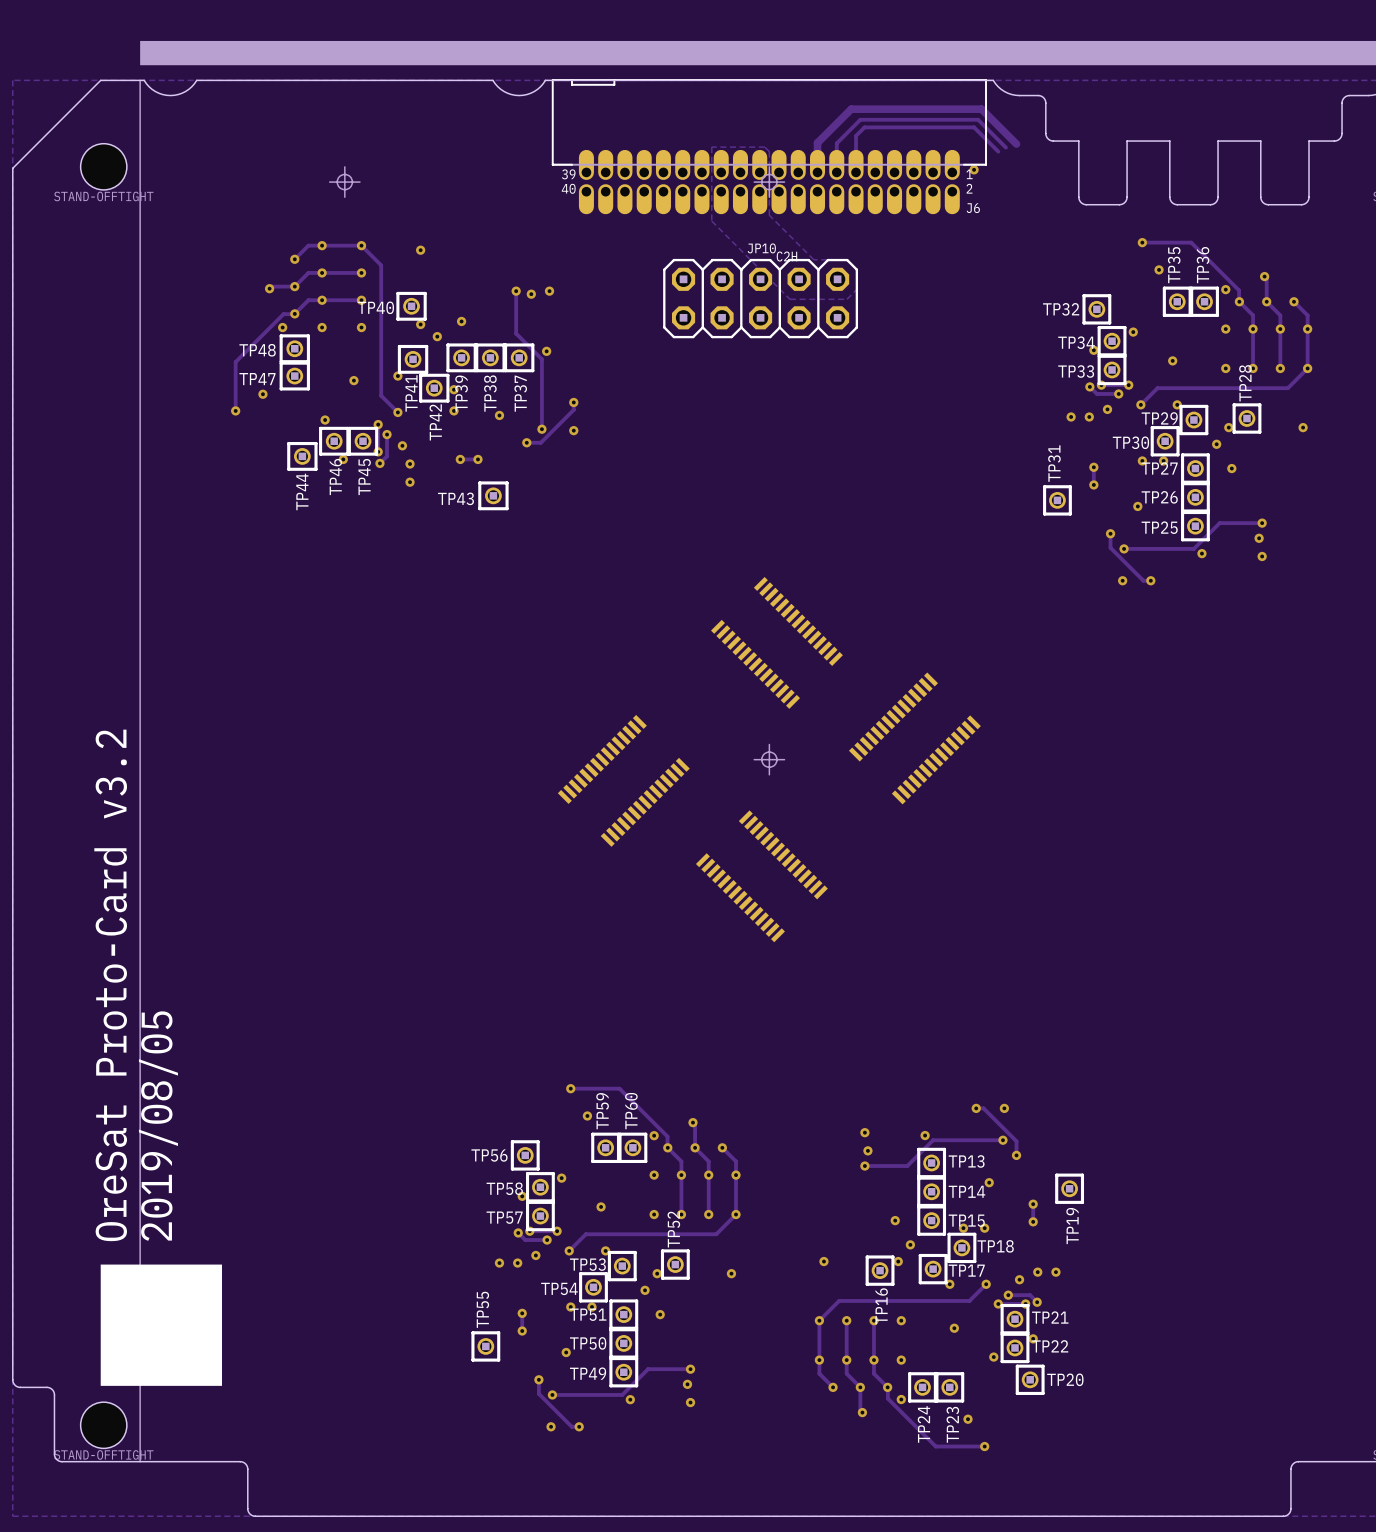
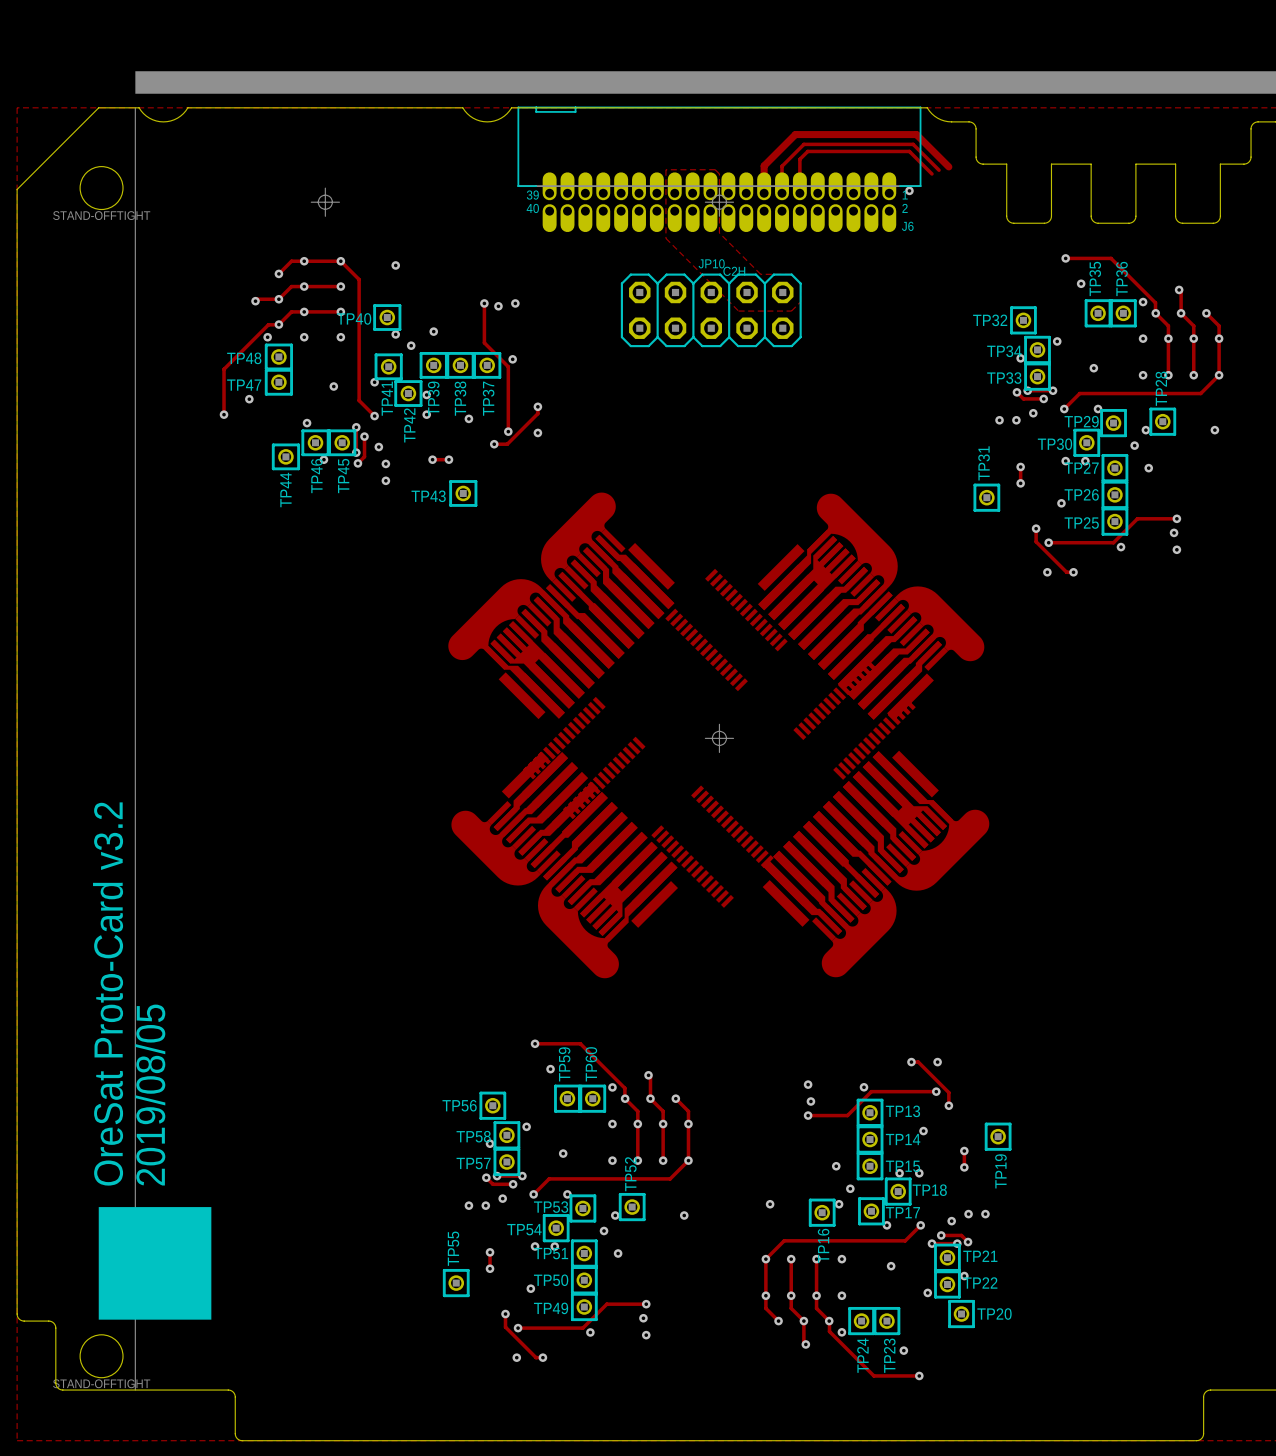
part: none -> (561, 605)
part: none -> (871, 606)
part: none -> (876, 863)
part: none -> (564, 864)

